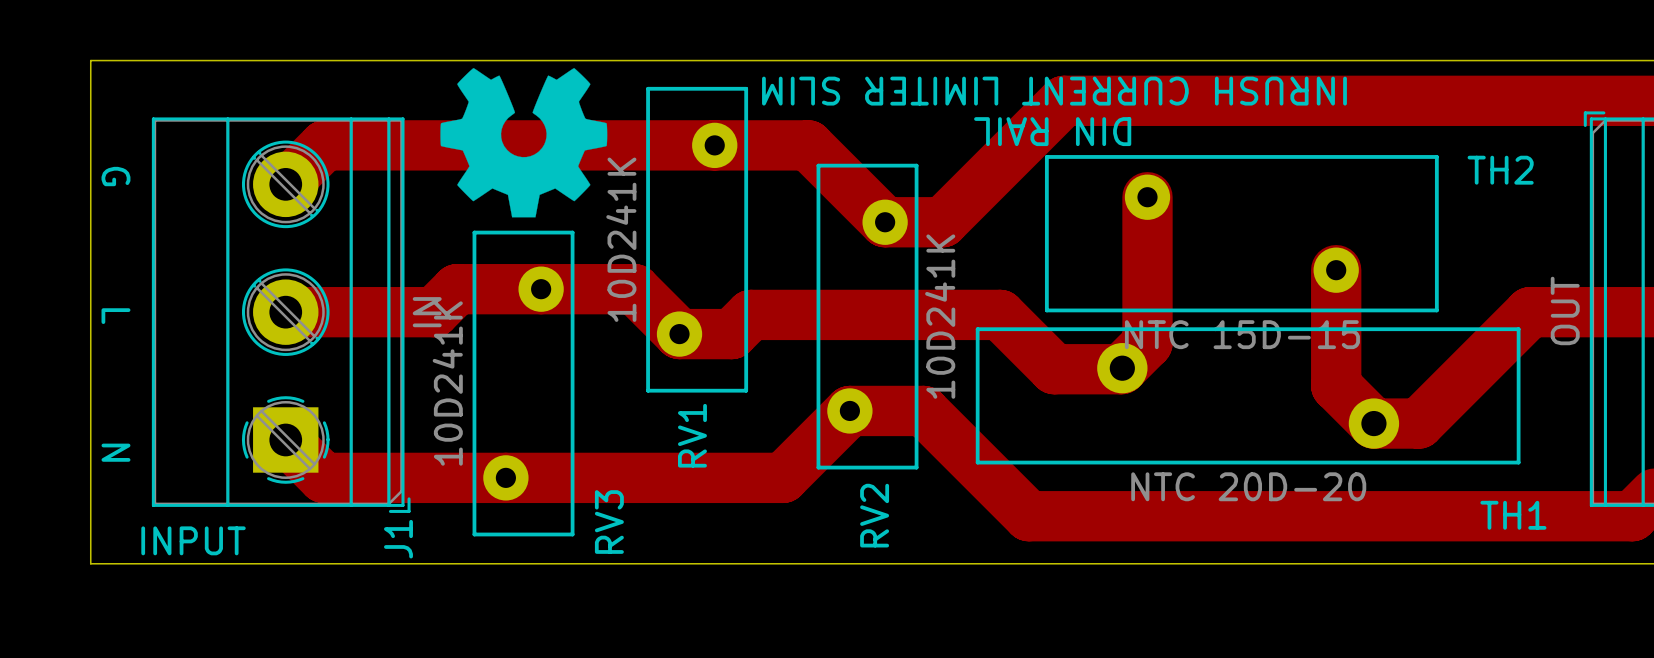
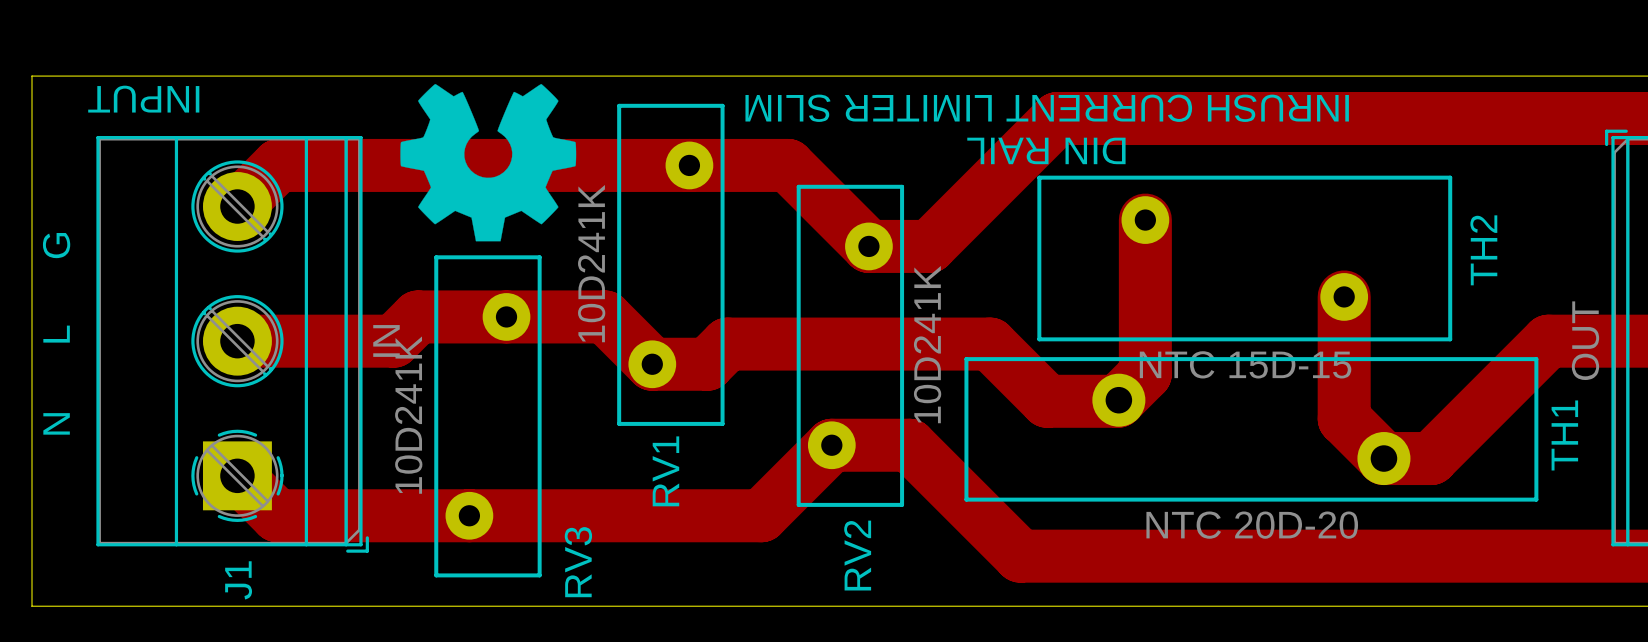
TH2 name rotation: 0° (1500, 170) -> 90° counterclockwise (1483, 250)
text: G L N (115, 314) -> N L G (56, 333)
TH1 name rotation: 0° (1513, 515) -> 90° counterclockwise (1564, 435)
TH1 name position: TH1 (1513, 515) -> TH1 (1564, 435)
J1 name position: J1 (398, 539) -> J1 (238, 580)
text rotation: 0° (193, 540) -> 180° (143, 99)
text position: INPUT (193, 540) -> INPUT (143, 99)

